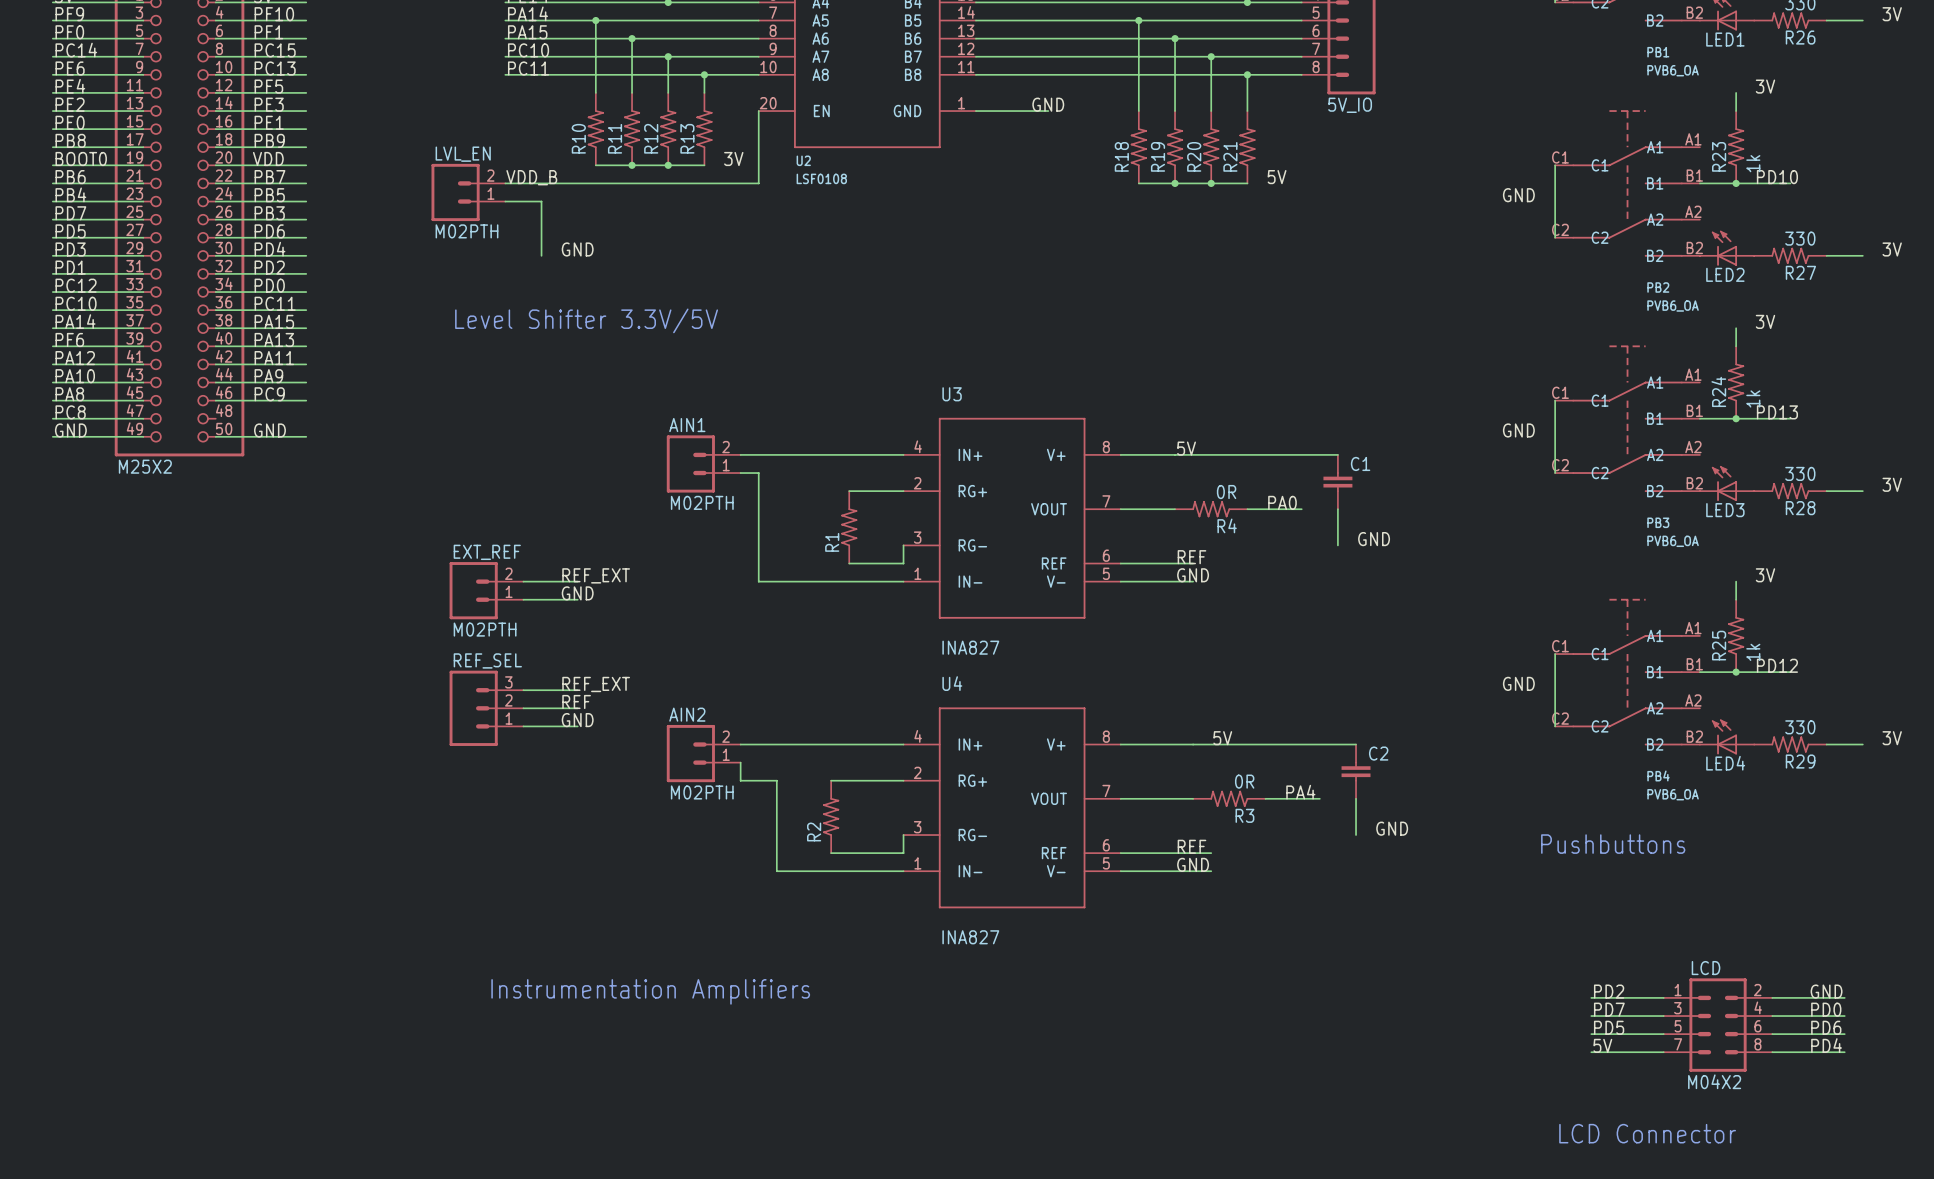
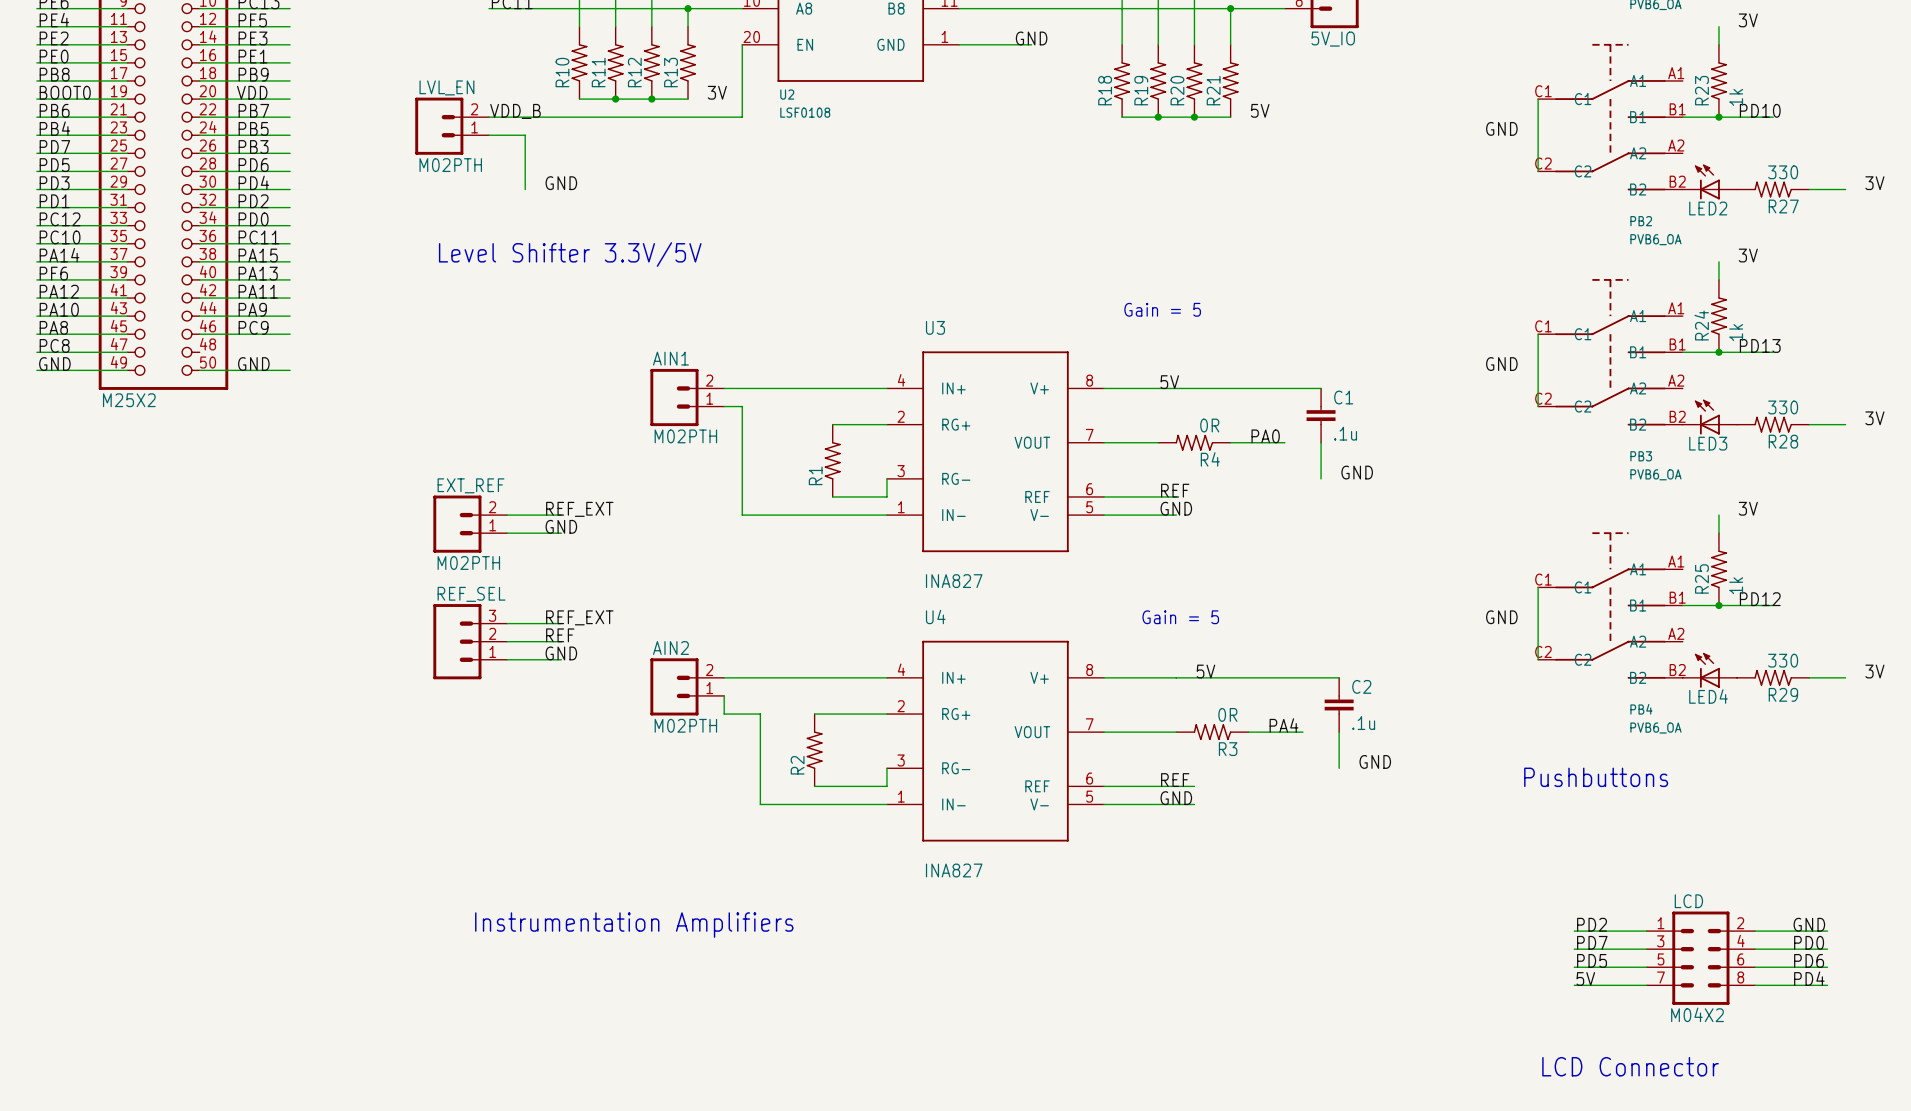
text: none -> Gain = 5 (1162, 309)
C1 value: none -> .1u (1345, 433)
text: none -> Gain = 5 (1180, 617)
C2 value: none -> .1u (1363, 723)

